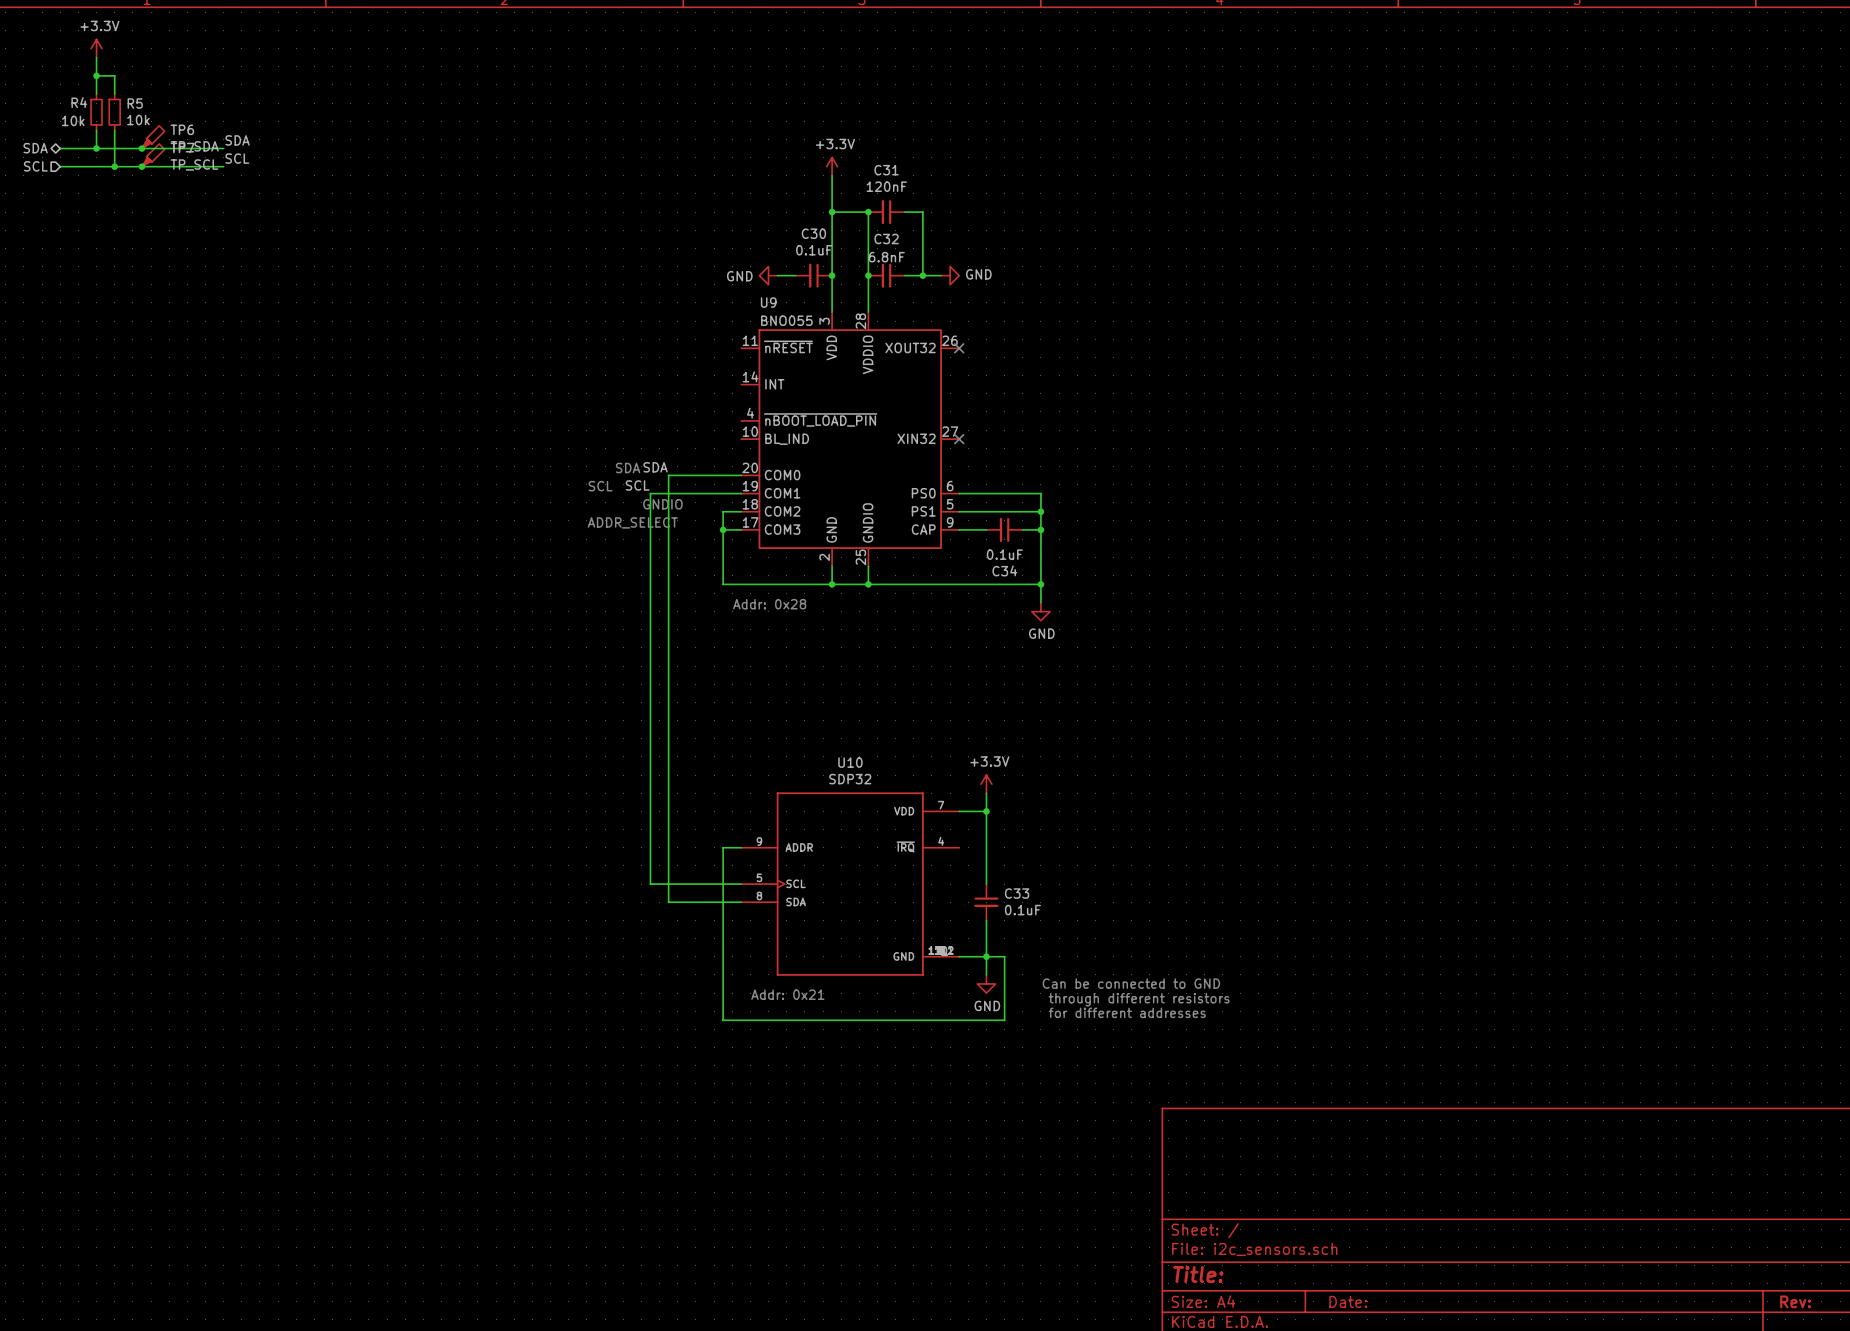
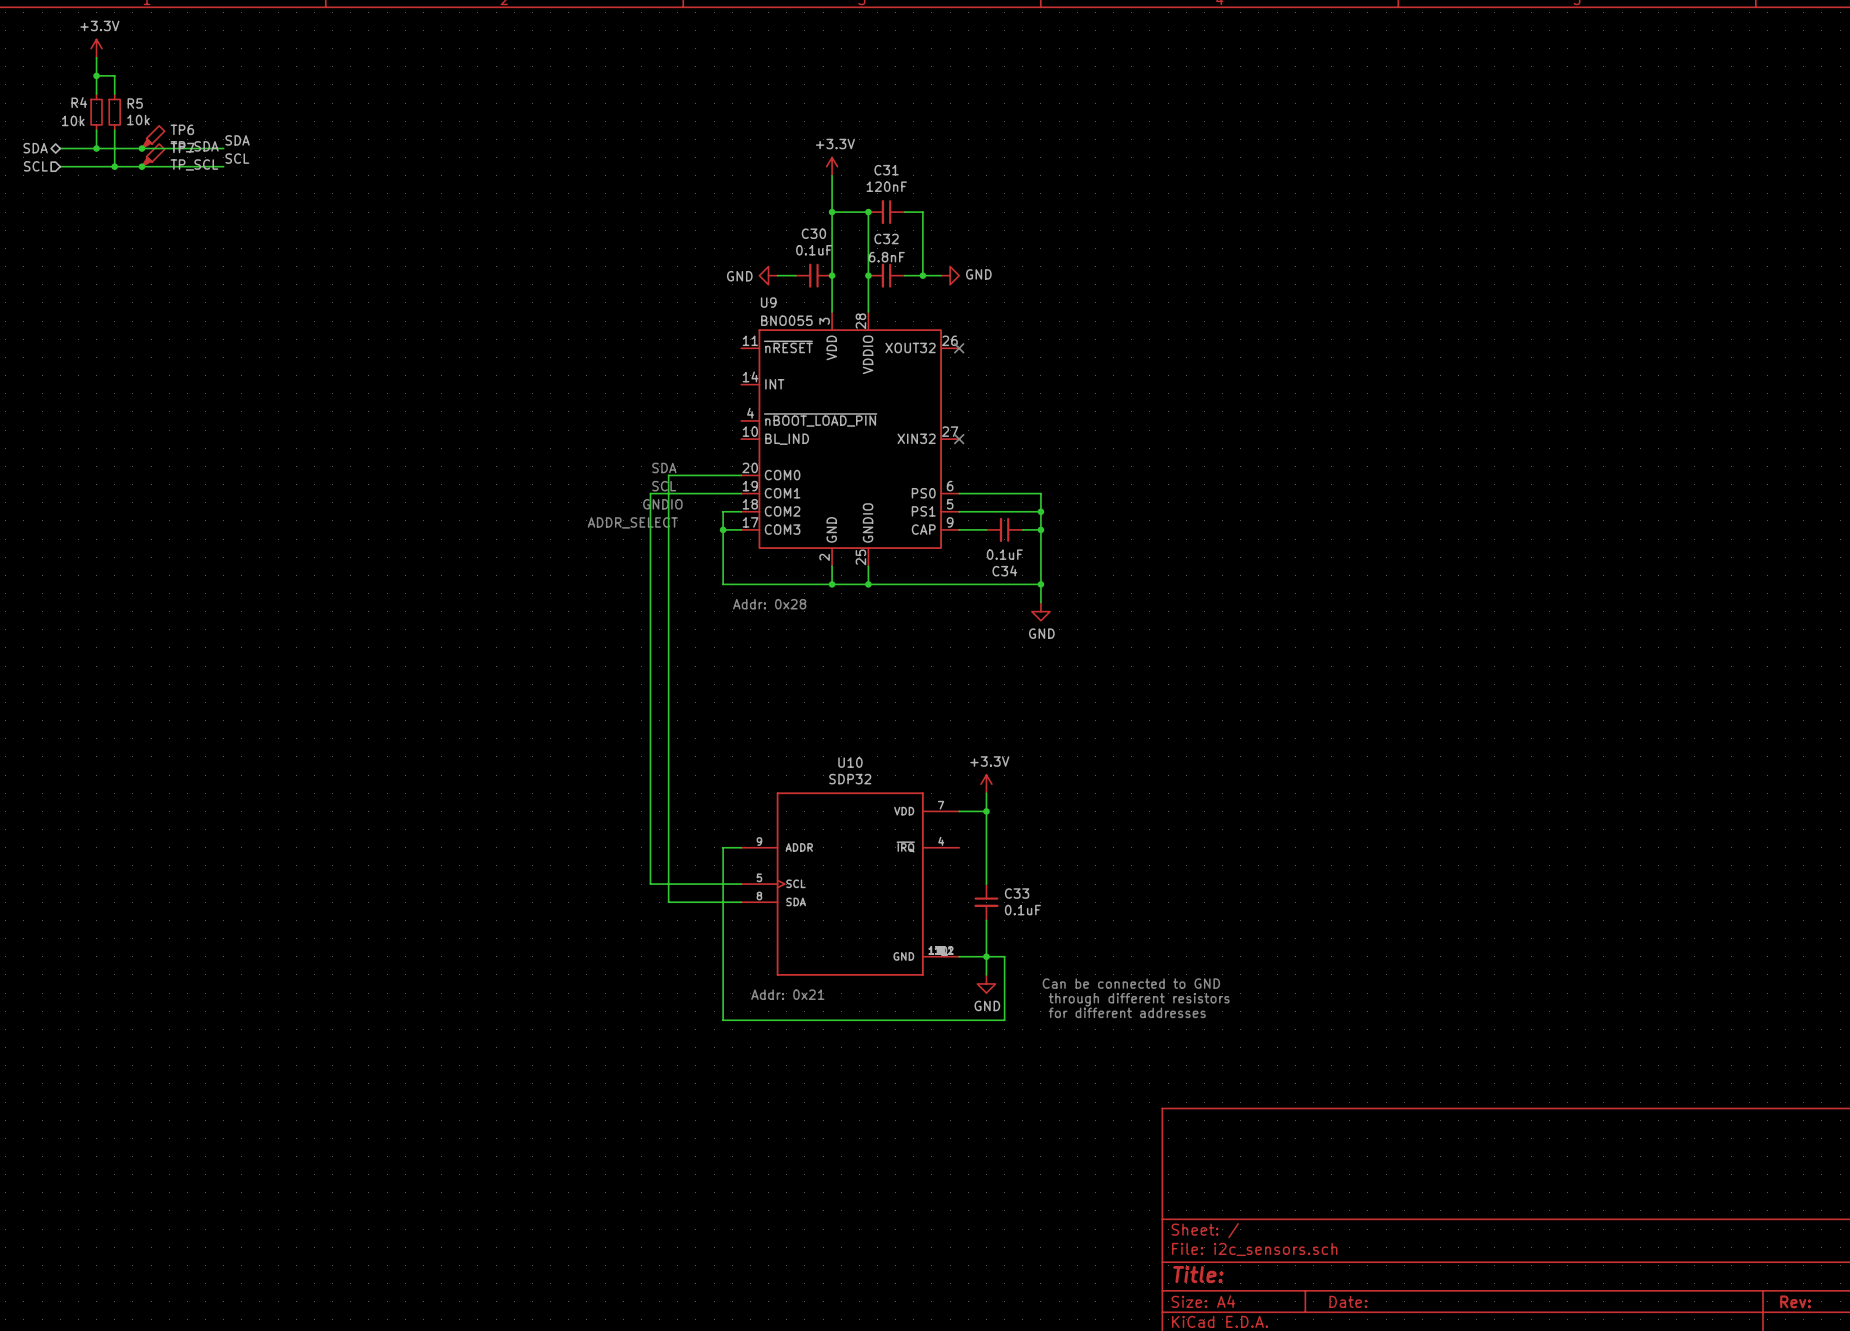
text position: SDA (628, 467) -> SDA (664, 467)
label: SDA (655, 467) -> none
label: SCL (637, 485) -> none
text position: SCL (600, 486) -> SCL (664, 486)

